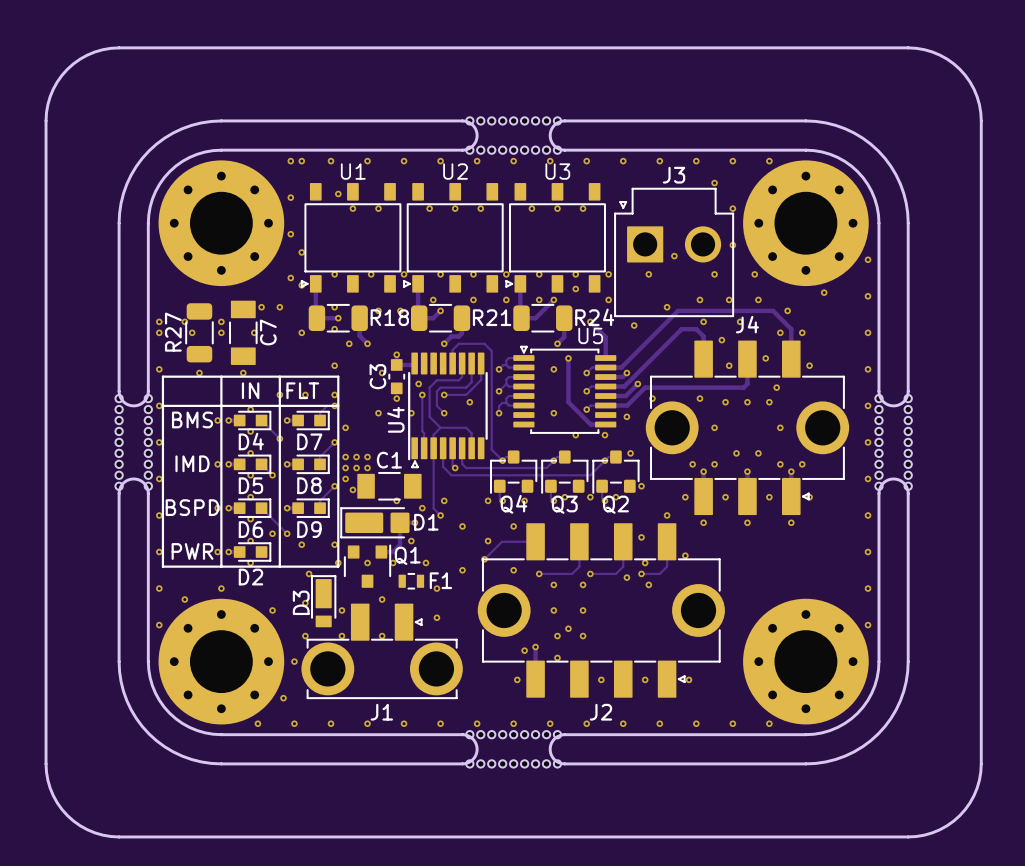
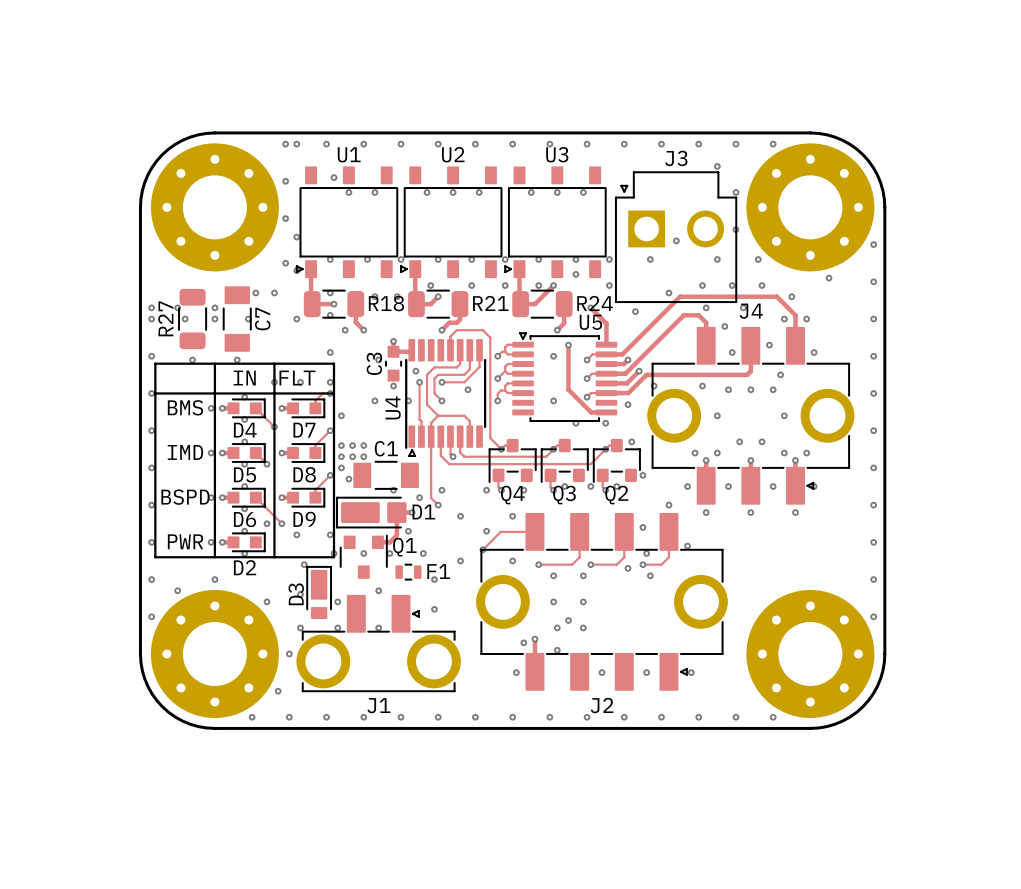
board edge: (119, 47) (908, 47) (932, 51) (947, 59) (959, 69) (970, 82) (977, 96) (981, 120) (981, 763) (977, 788) (970, 802) (959, 815) (947, 825) (932, 832) (908, 836) (119, 836) (94, 832) (80, 825) (67, 815) (57, 802) (50, 788) (46, 763) (46, 112) (50, 96) (57, 82) (73, 63) (94, 51) (119, 47) -> none
part: (513, 135) -> none
board edge: (462, 150) (472, 145) (477, 135) (472, 125) (462, 120) (211, 121) (182, 128) (156, 144) (142, 158) (126, 184) (121, 203) (119, 223) (119, 393) (124, 402) (133, 405) (144, 401) (148, 391) -> (140, 482) (140, 378)
board edge: none -> (460, 132) (564, 132)
board edge: (564, 150) (554, 145) (550, 135) (554, 125) (564, 120) (815, 121) (845, 128) (870, 144) (884, 158) (900, 184) (906, 203) (908, 223) (908, 393) (902, 402) (893, 405) (883, 401) (878, 391) -> (884, 482) (884, 378)
part: (133, 442) -> none
part: (893, 442) -> none
board edge: (148, 493) (144, 483) (133, 478) (124, 481) (119, 491) (119, 661) (121, 681) (126, 700) (142, 726) (156, 740) (182, 756) (211, 763) (462, 763) (472, 759) (477, 749) (472, 738) (462, 734) -> (564, 728) (460, 728)
board edge: (878, 493) (883, 483) (893, 478) (902, 481) (908, 491) (908, 661) (906, 681) (900, 700) (884, 726) (870, 740) (845, 756) (815, 763) (564, 763) (554, 759) (550, 749) (554, 738) (564, 734) -> none
part: (513, 749) -> none

